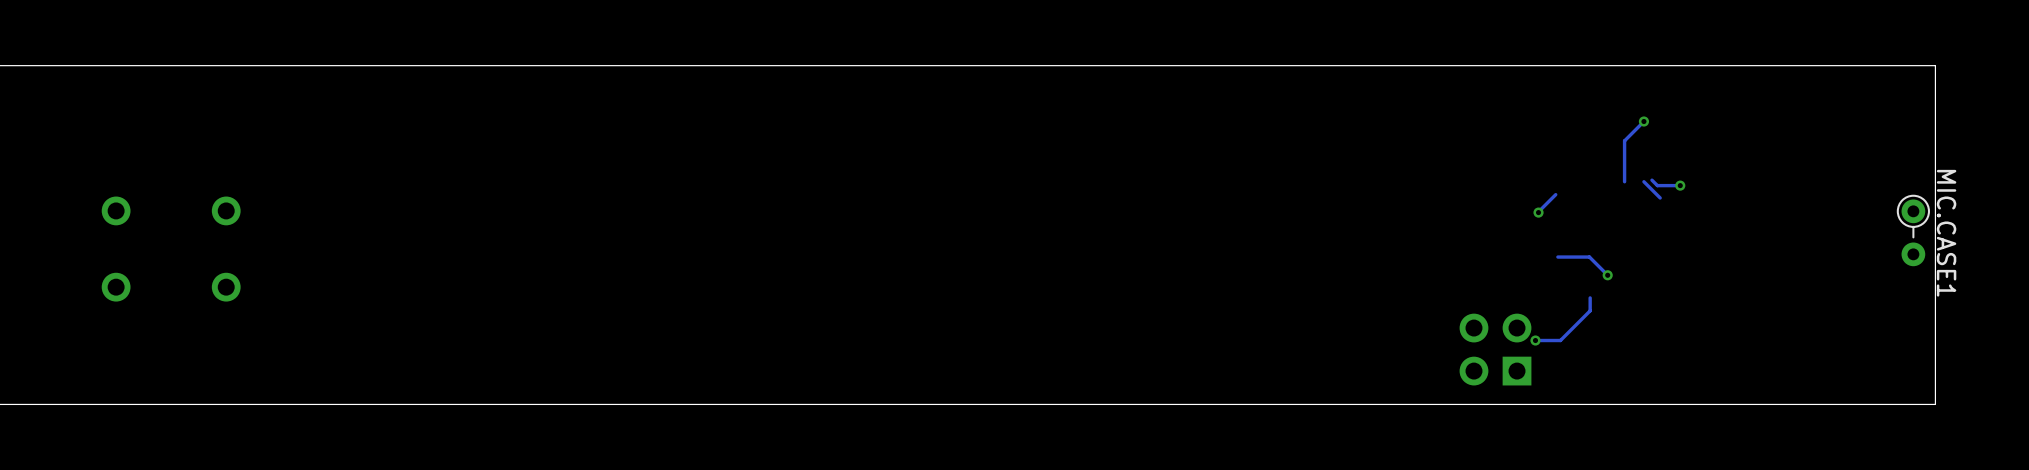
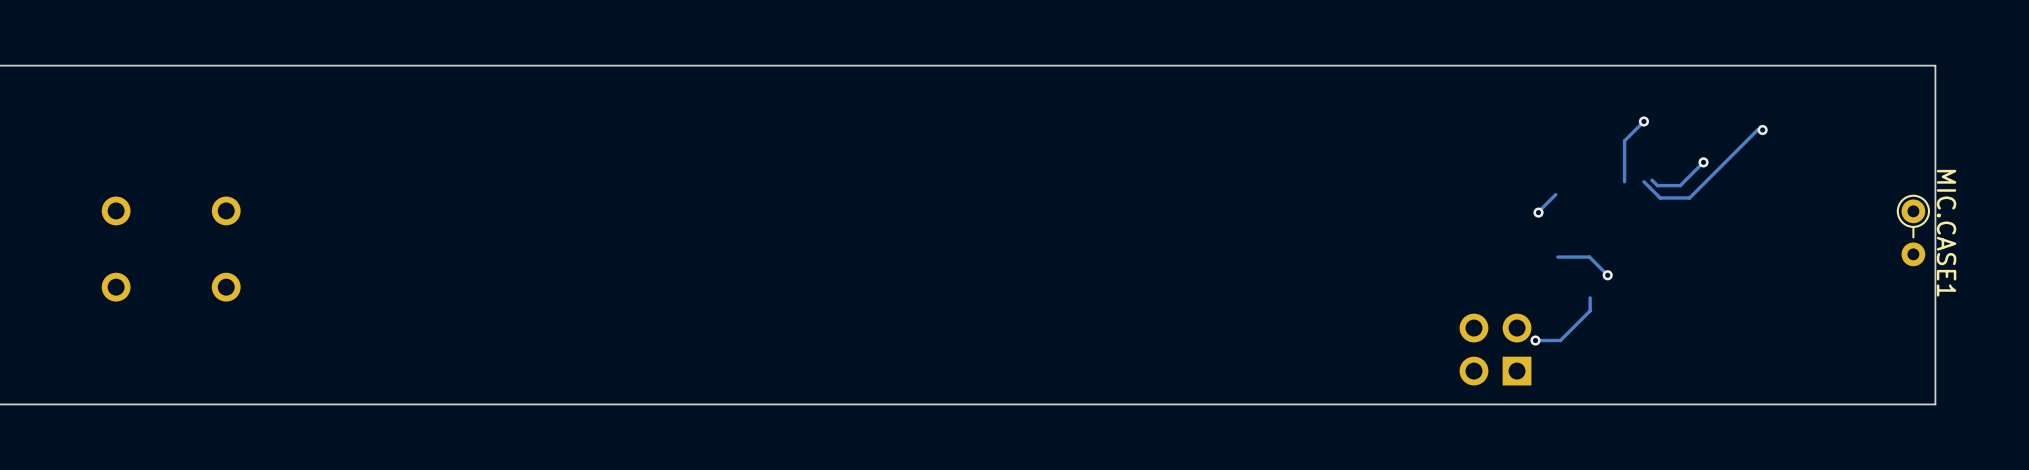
track: none -> (1762, 130) (1757, 130) (1689, 197) (1660, 197)
via: none -> (1762, 130)
track: none -> (1703, 162) (1680, 185)
via position: (1680, 185) -> (1703, 162)

